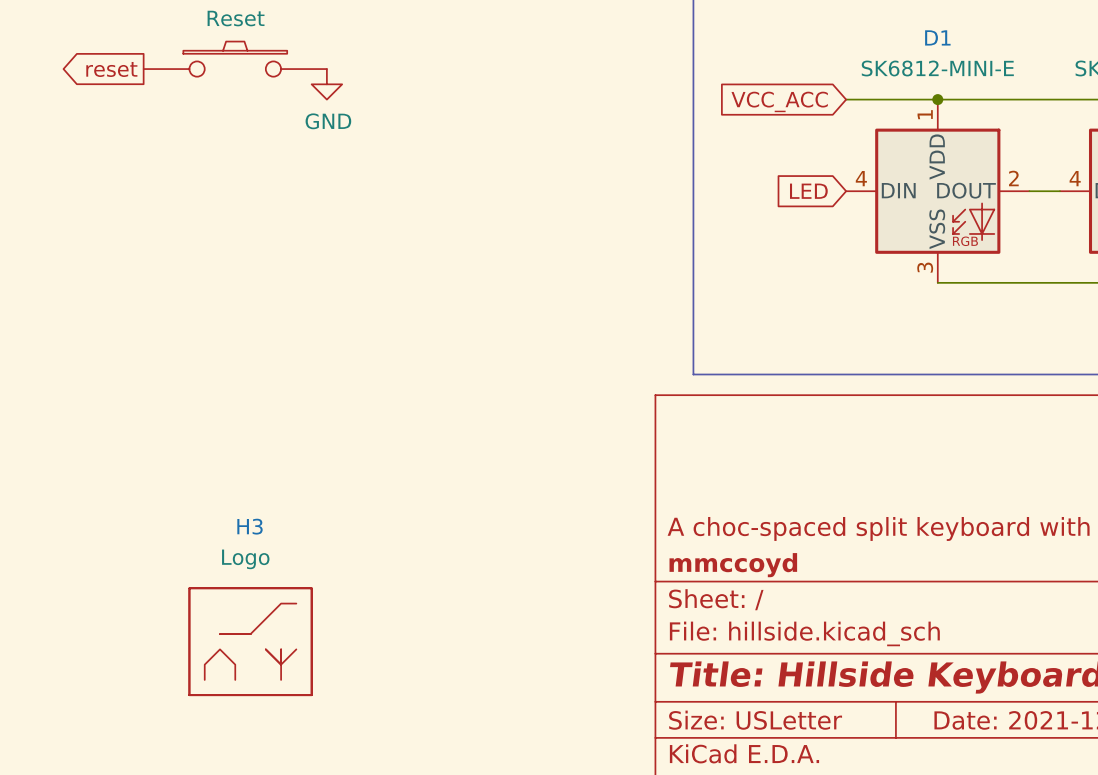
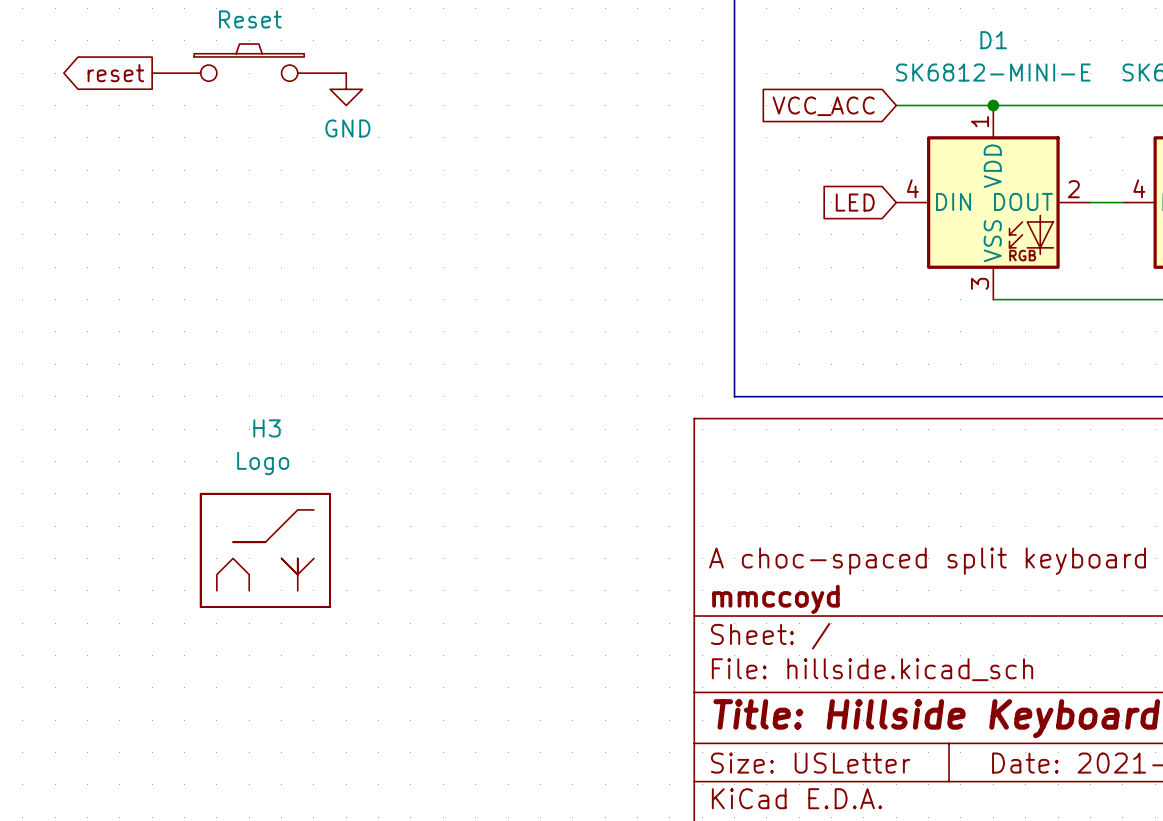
H3 position: (250, 641) -> (265, 550)

